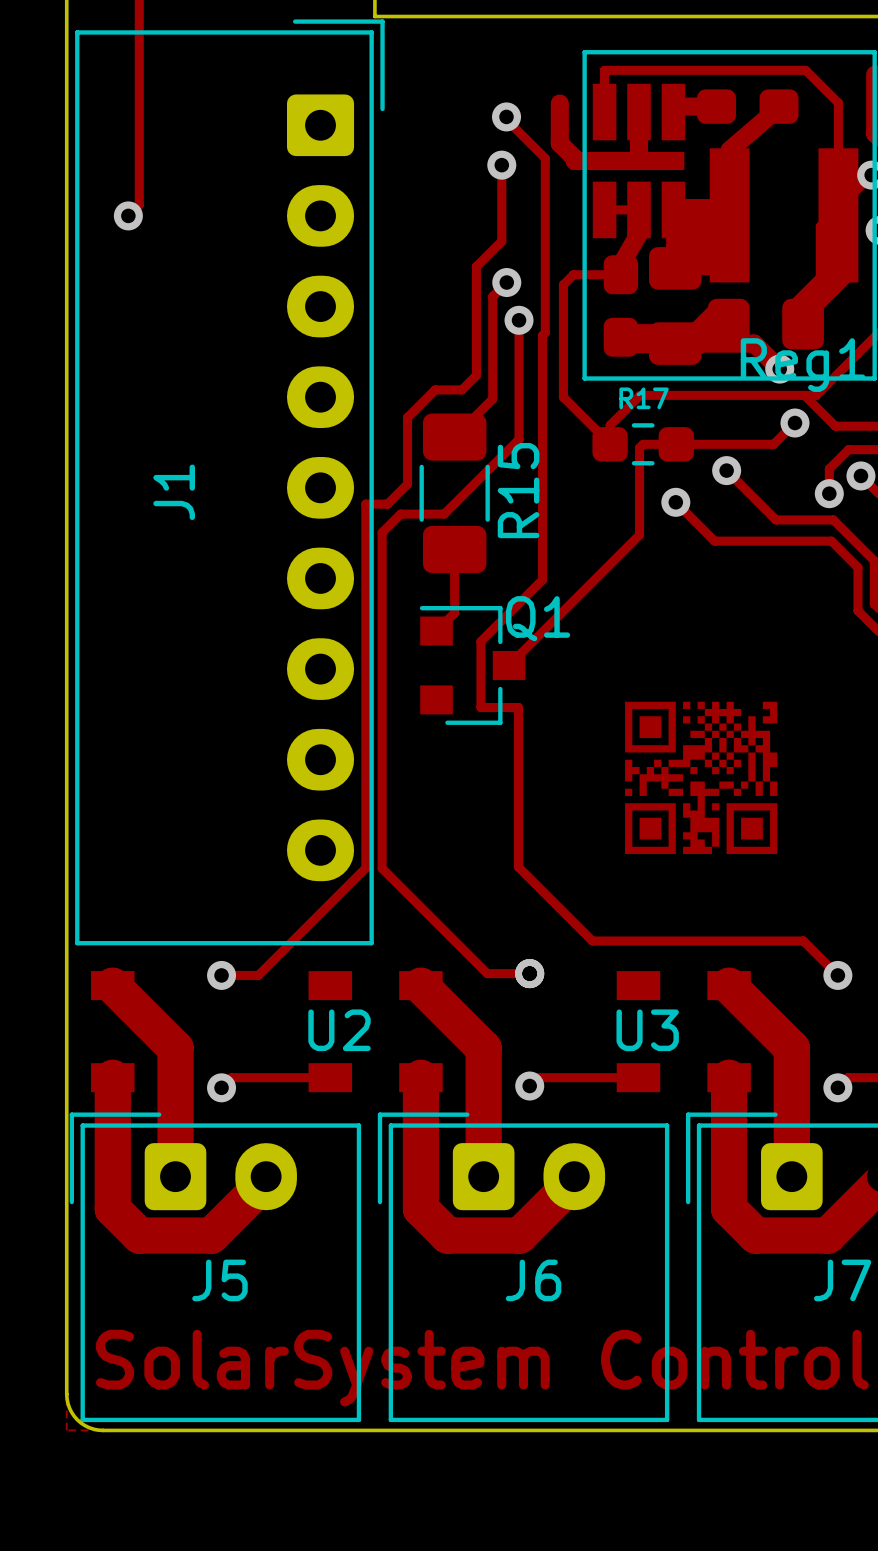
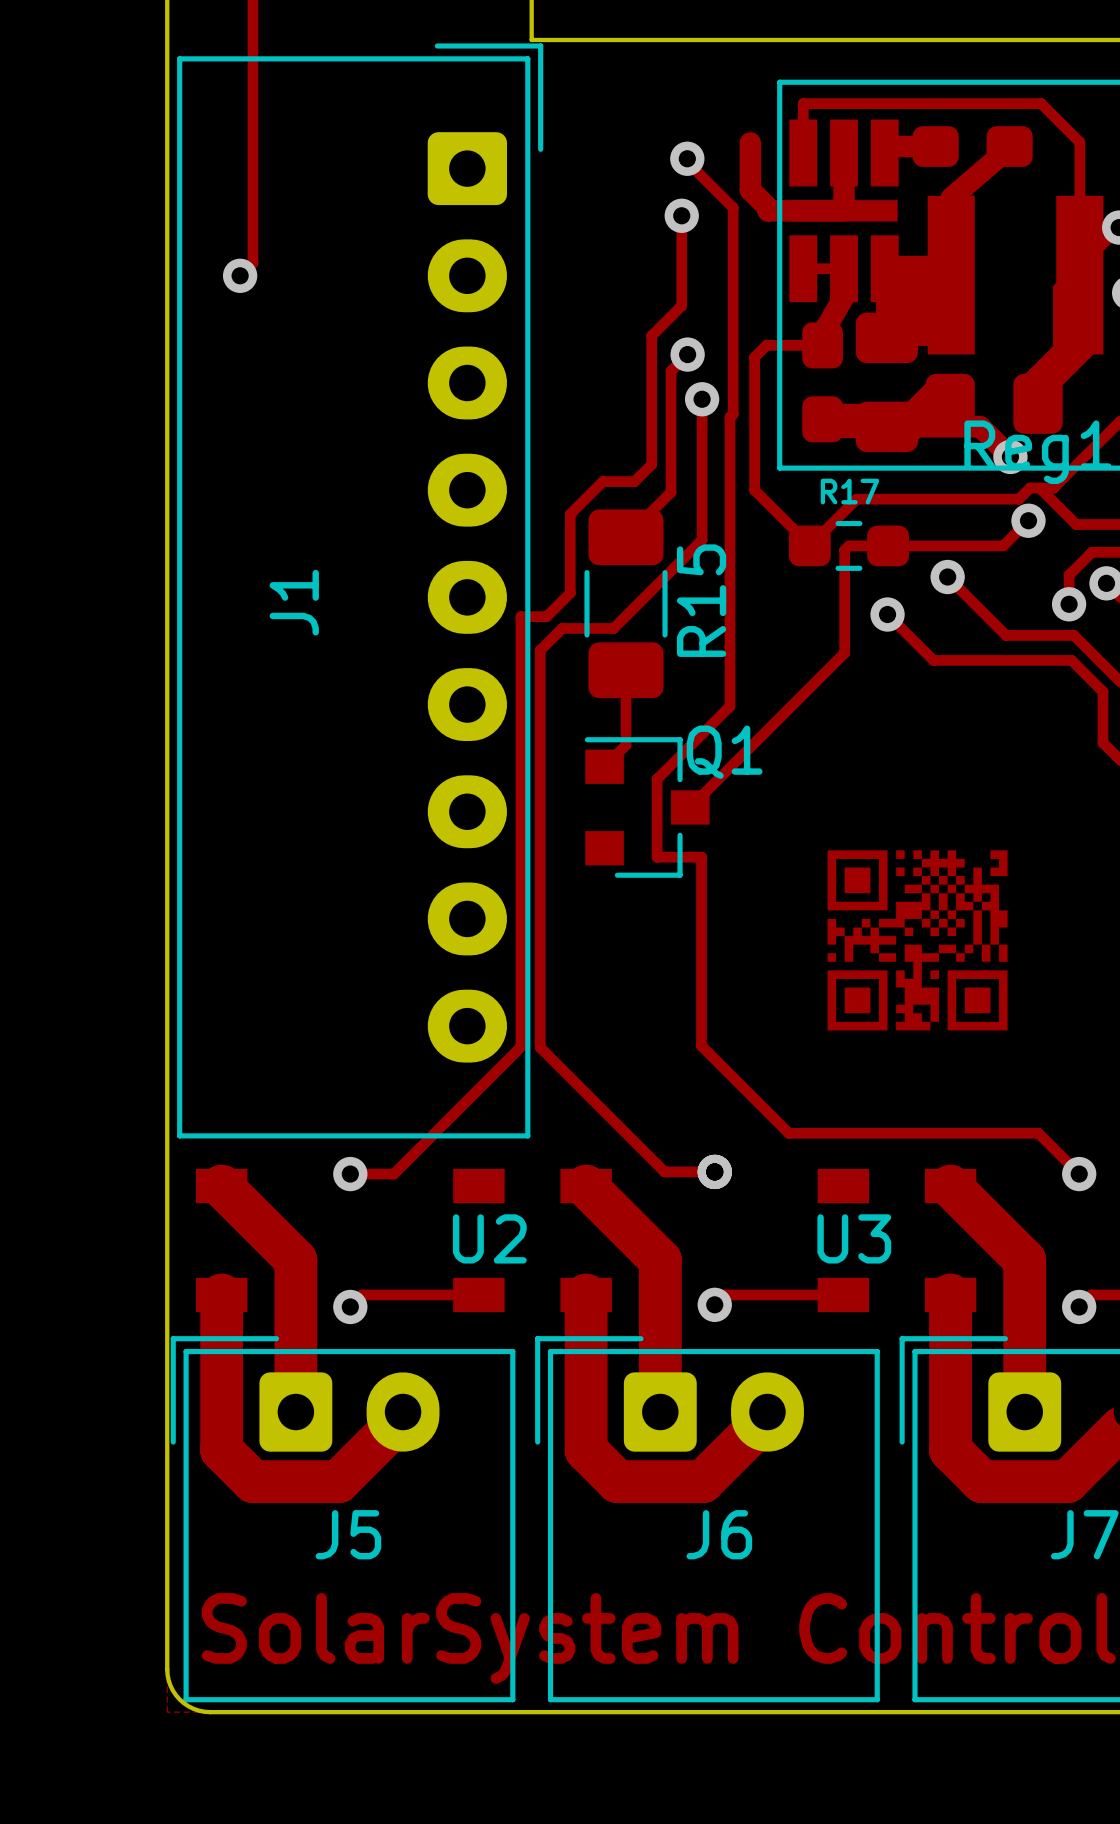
track: (796, 395) (640, 395) (610, 425) (610, 443) -> (1030, 488) (1018, 499) (856, 499) (809, 545)

